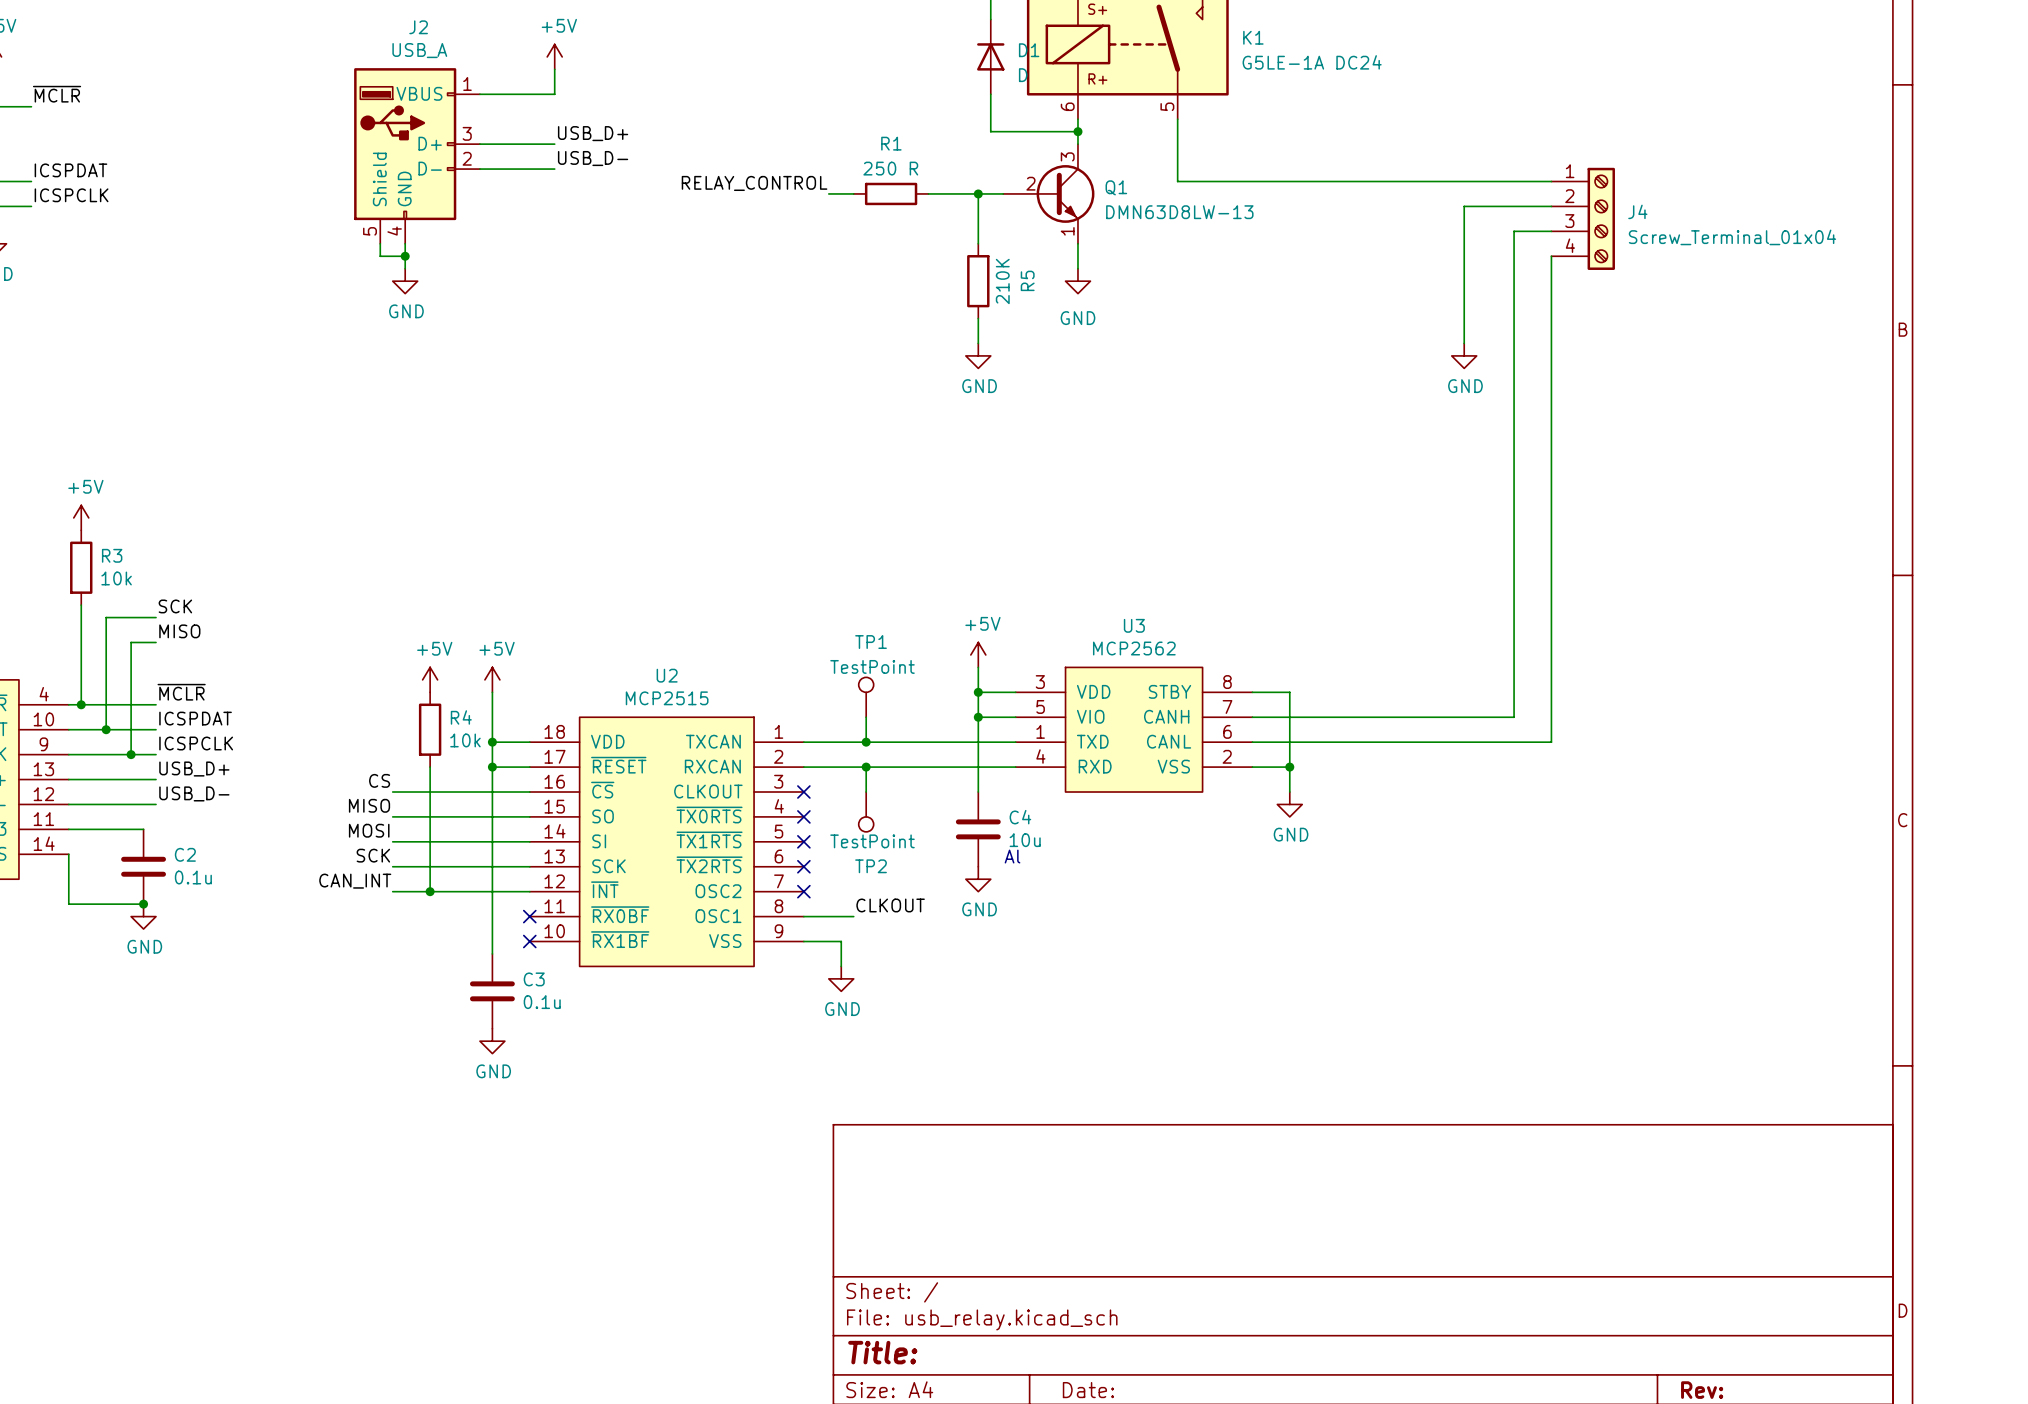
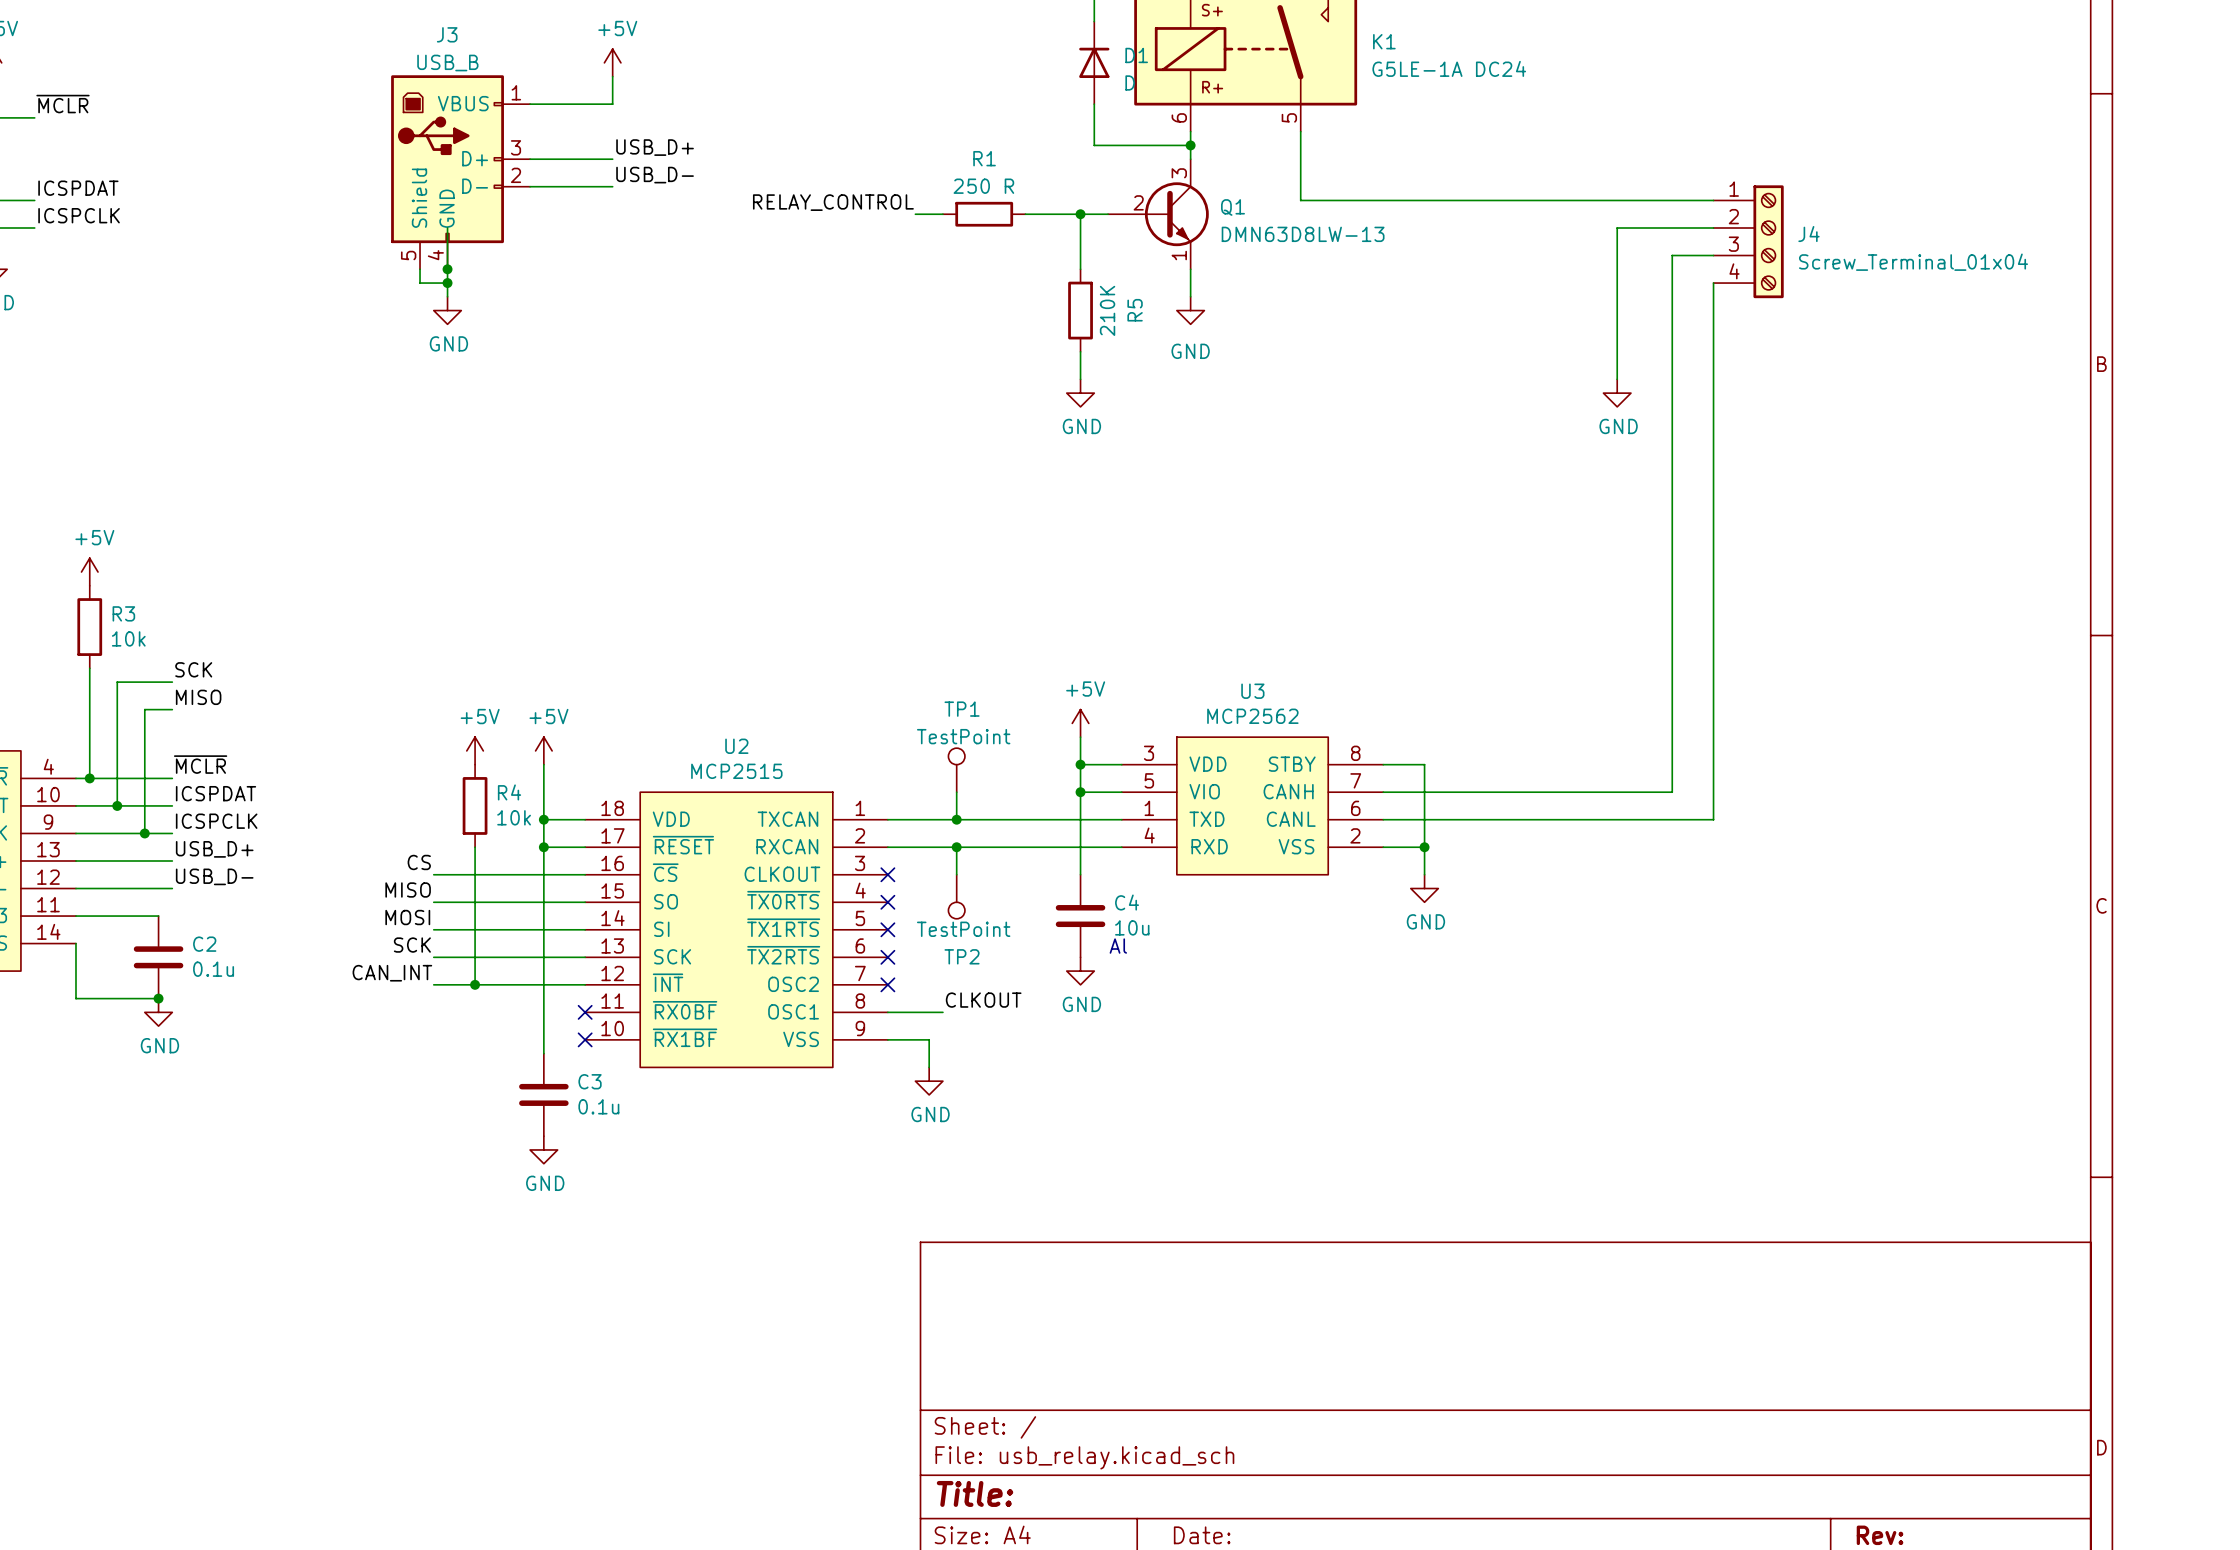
J2: USB_A (417, 155) -> none
J3: none -> USB_B (460, 172)
junction: none -> (447, 269)

